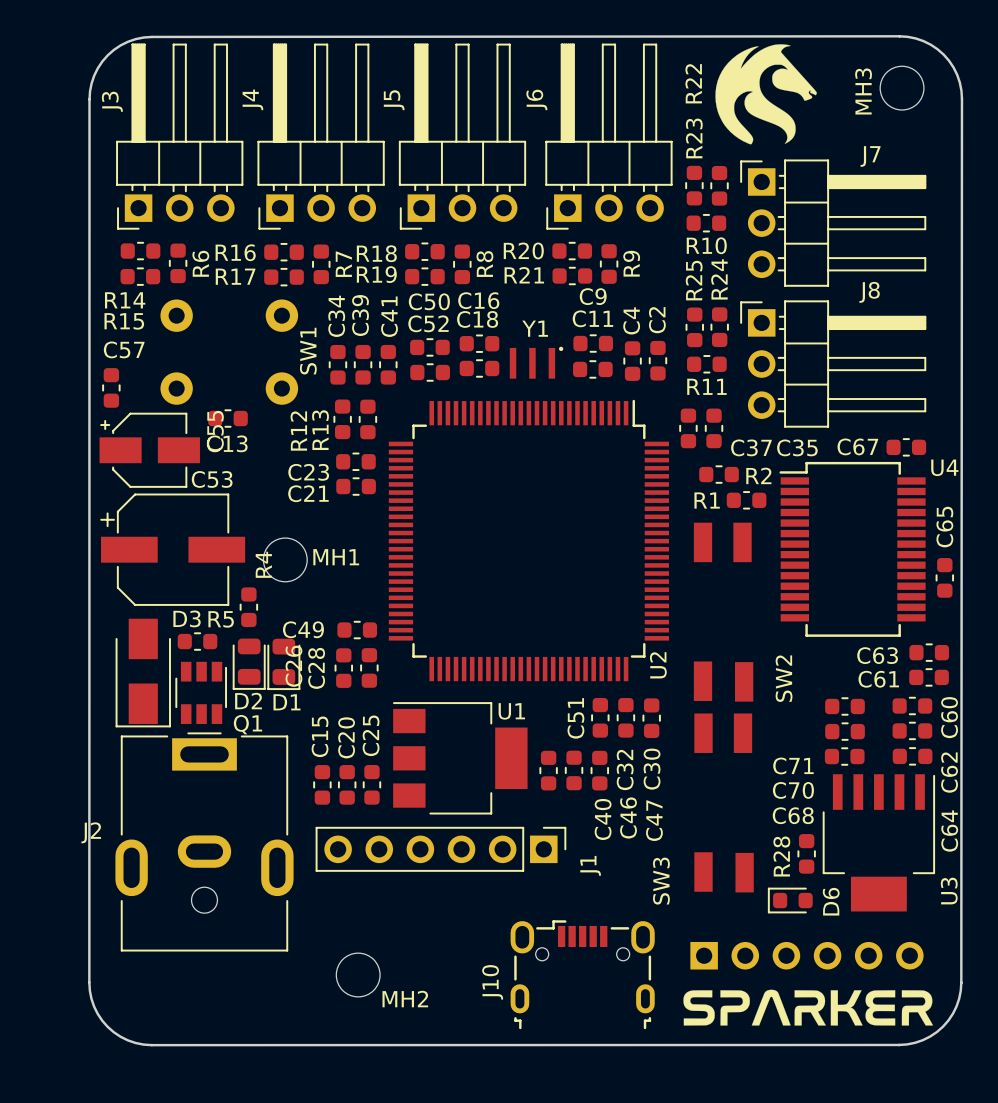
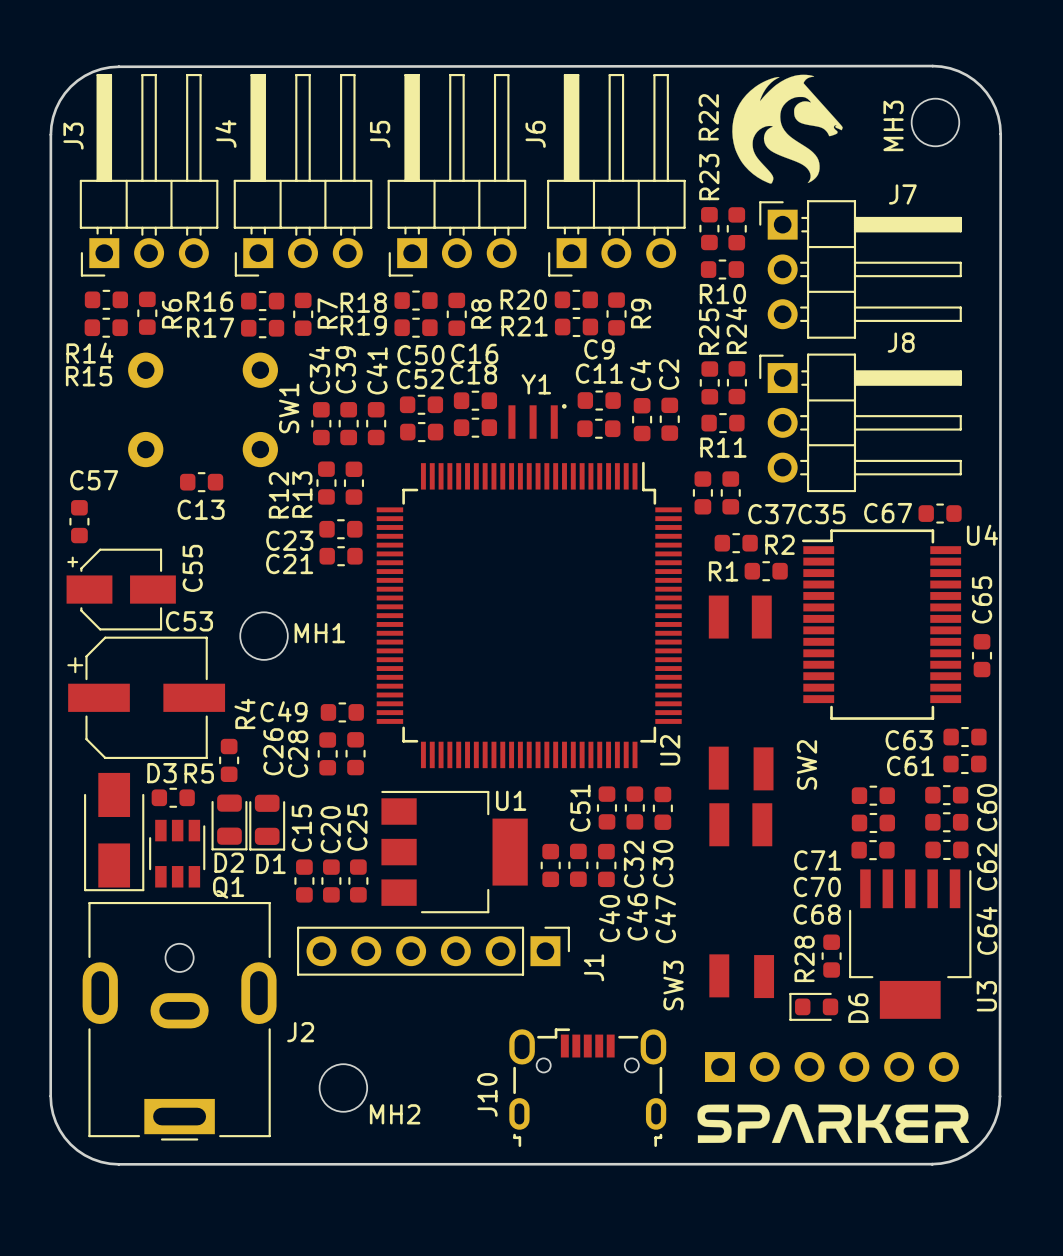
C57 position: (111, 387) -> (79, 521)
C55 position: (149, 450) -> (121, 589)
C53 position: (172, 549) -> (146, 697)
R4 position: (248, 607) -> (229, 760)
R5 position: (197, 641) -> (173, 797)
D2 position: (249, 664) -> (229, 822)
D1 position: (283, 664) -> (267, 822)
D3 position: (143, 673) -> (114, 832)
Q1 position: (201, 692) -> (177, 853)
J2 rotation: 0° (204, 841) -> 180° (179, 1021)

